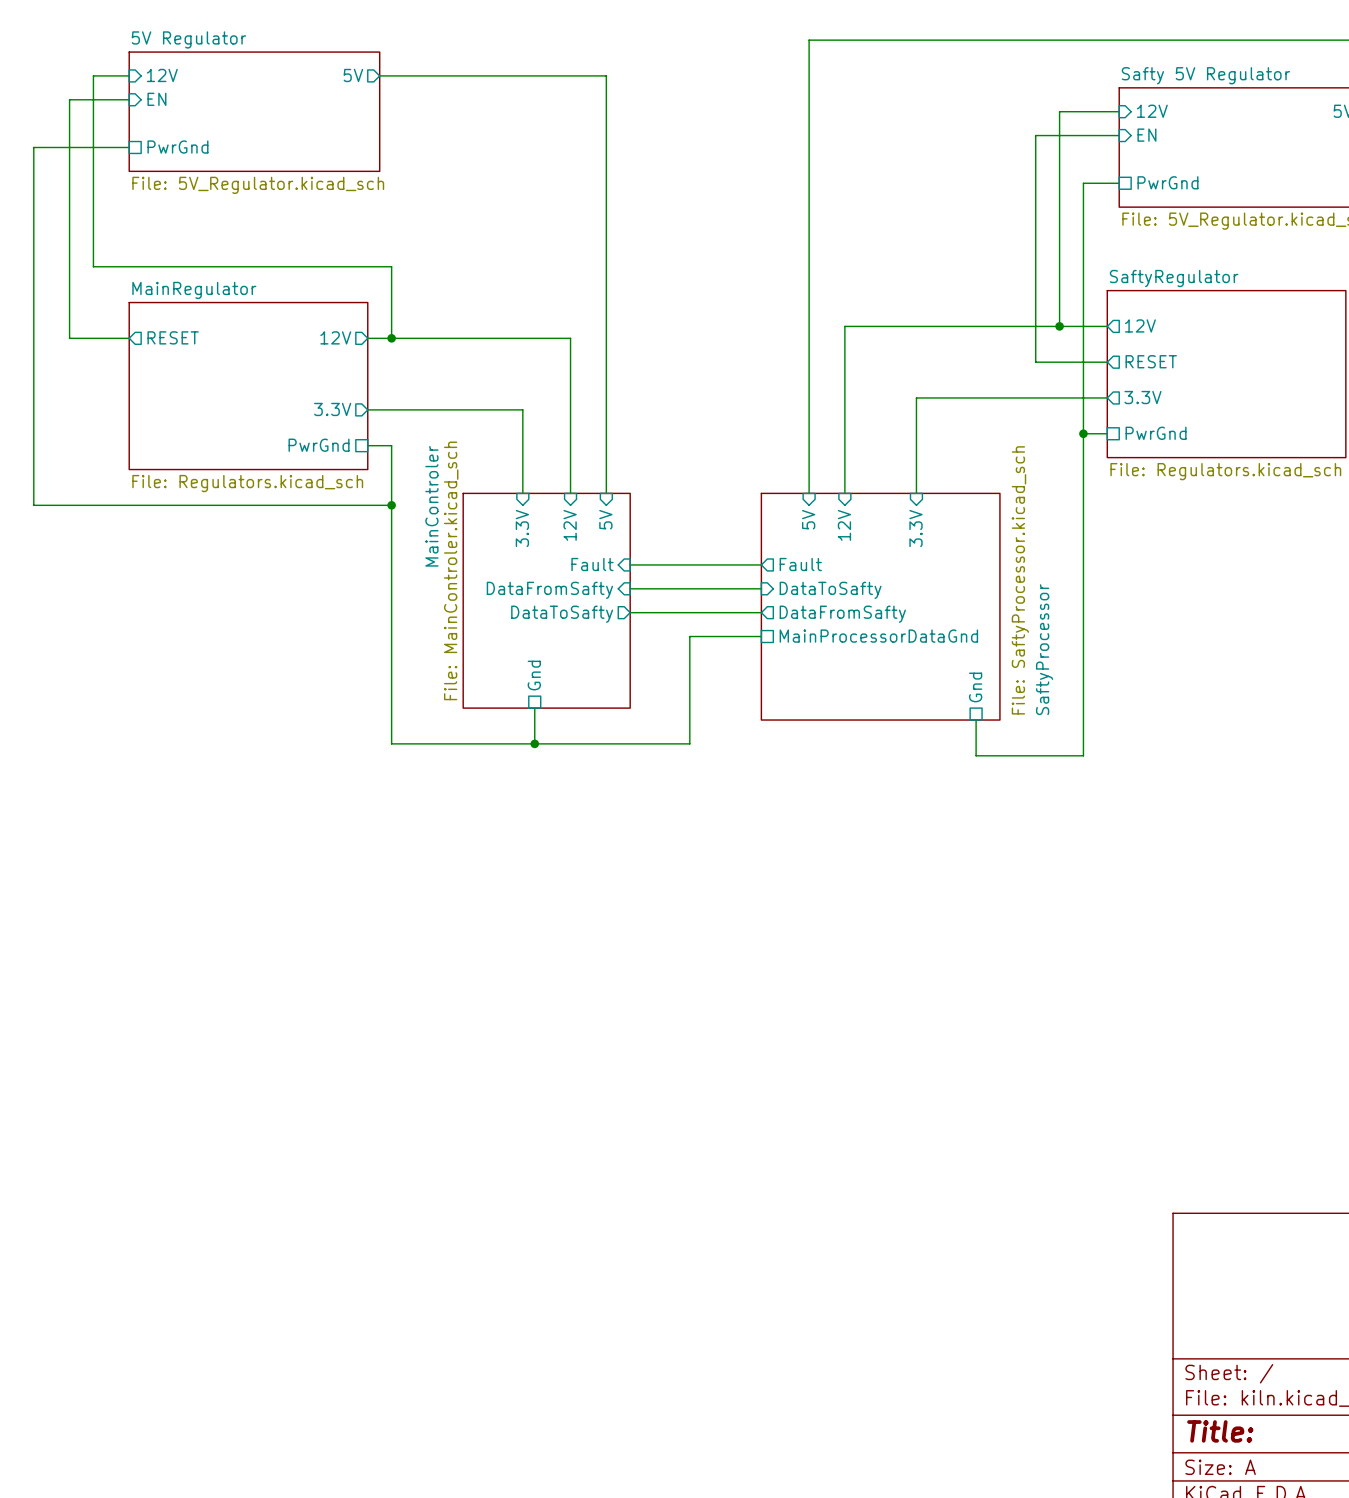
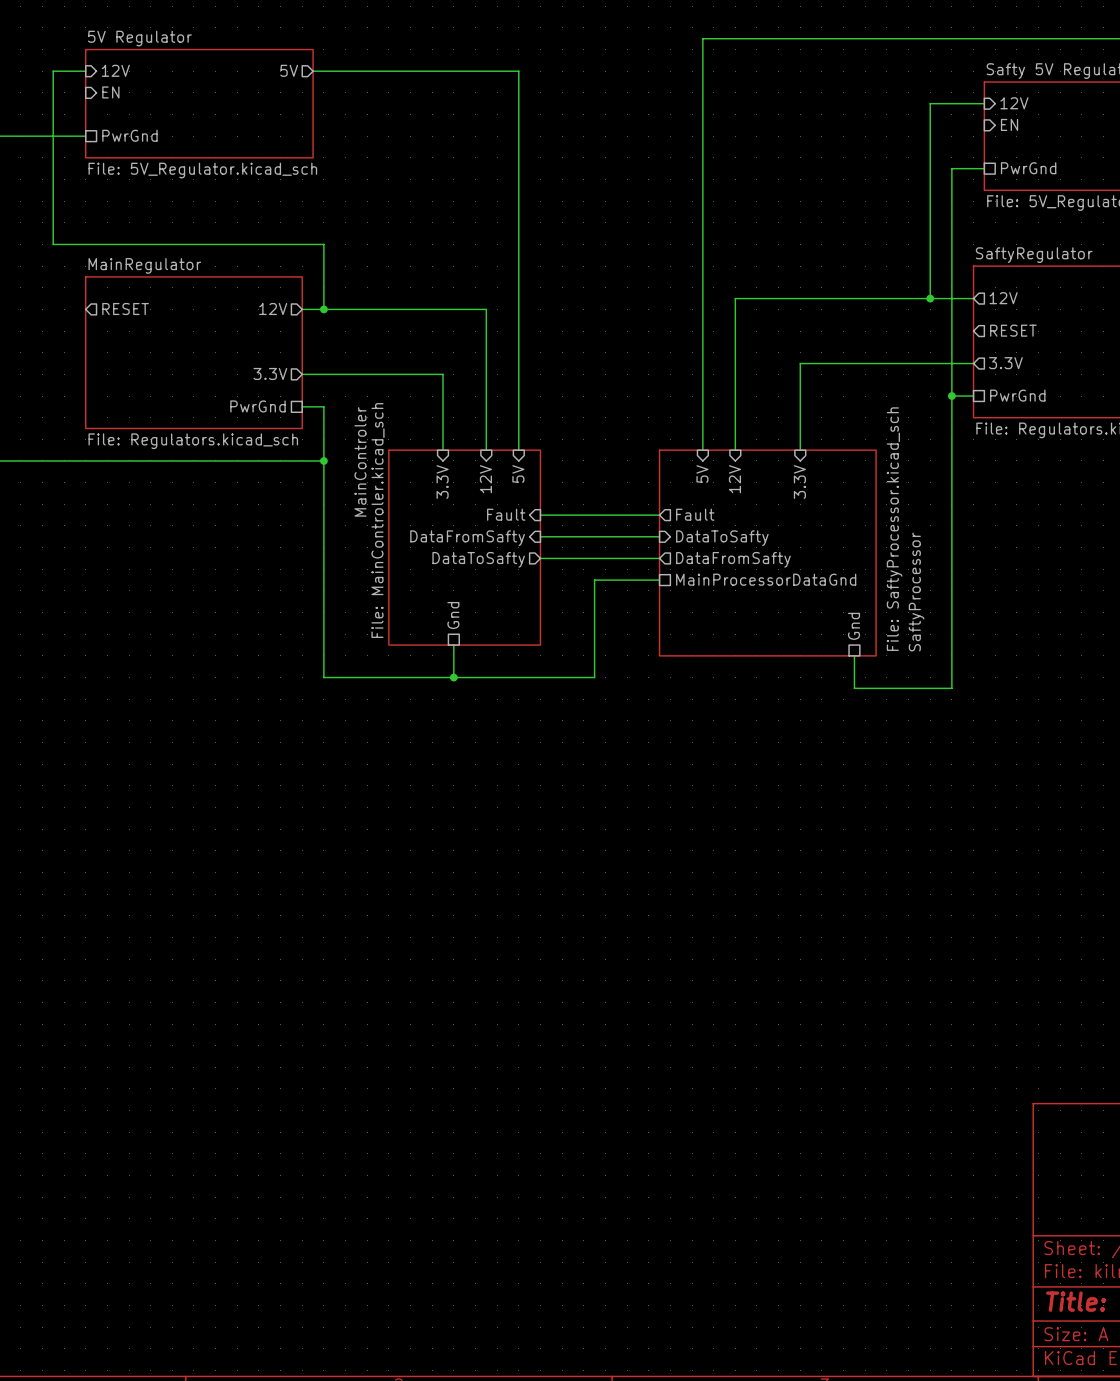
wire: (129, 99) (69, 99) (69, 338) (129, 338) -> none
wire: (1119, 135) (1035, 135) (1035, 362) (1107, 362) -> none

